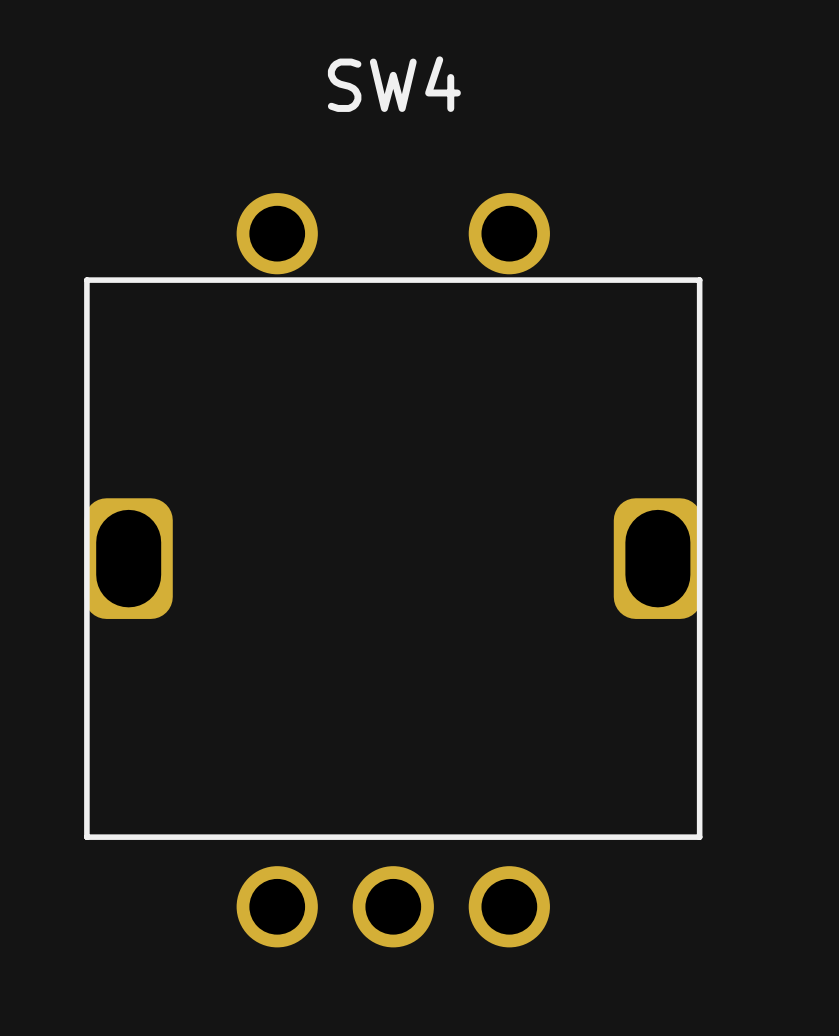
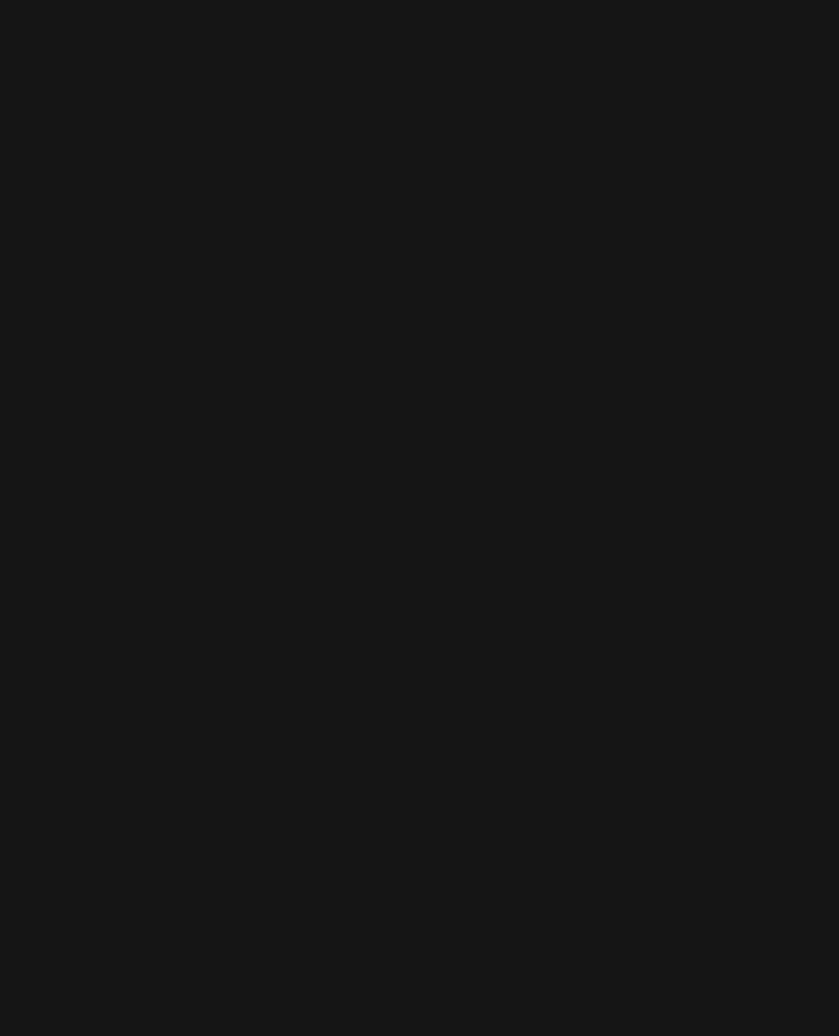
SW4: (393, 570) -> none

